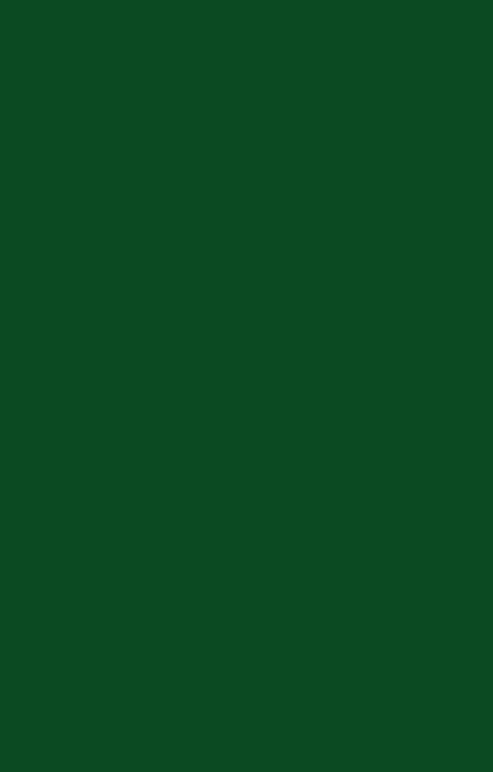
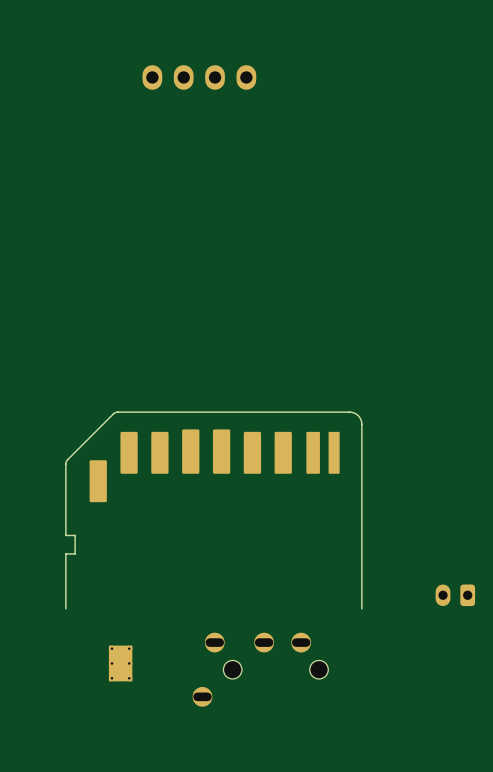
part: none -> (199, 77)
part: none -> (213, 510)
part: none -> (455, 595)
part: none -> (120, 663)
part: none -> (260, 669)

